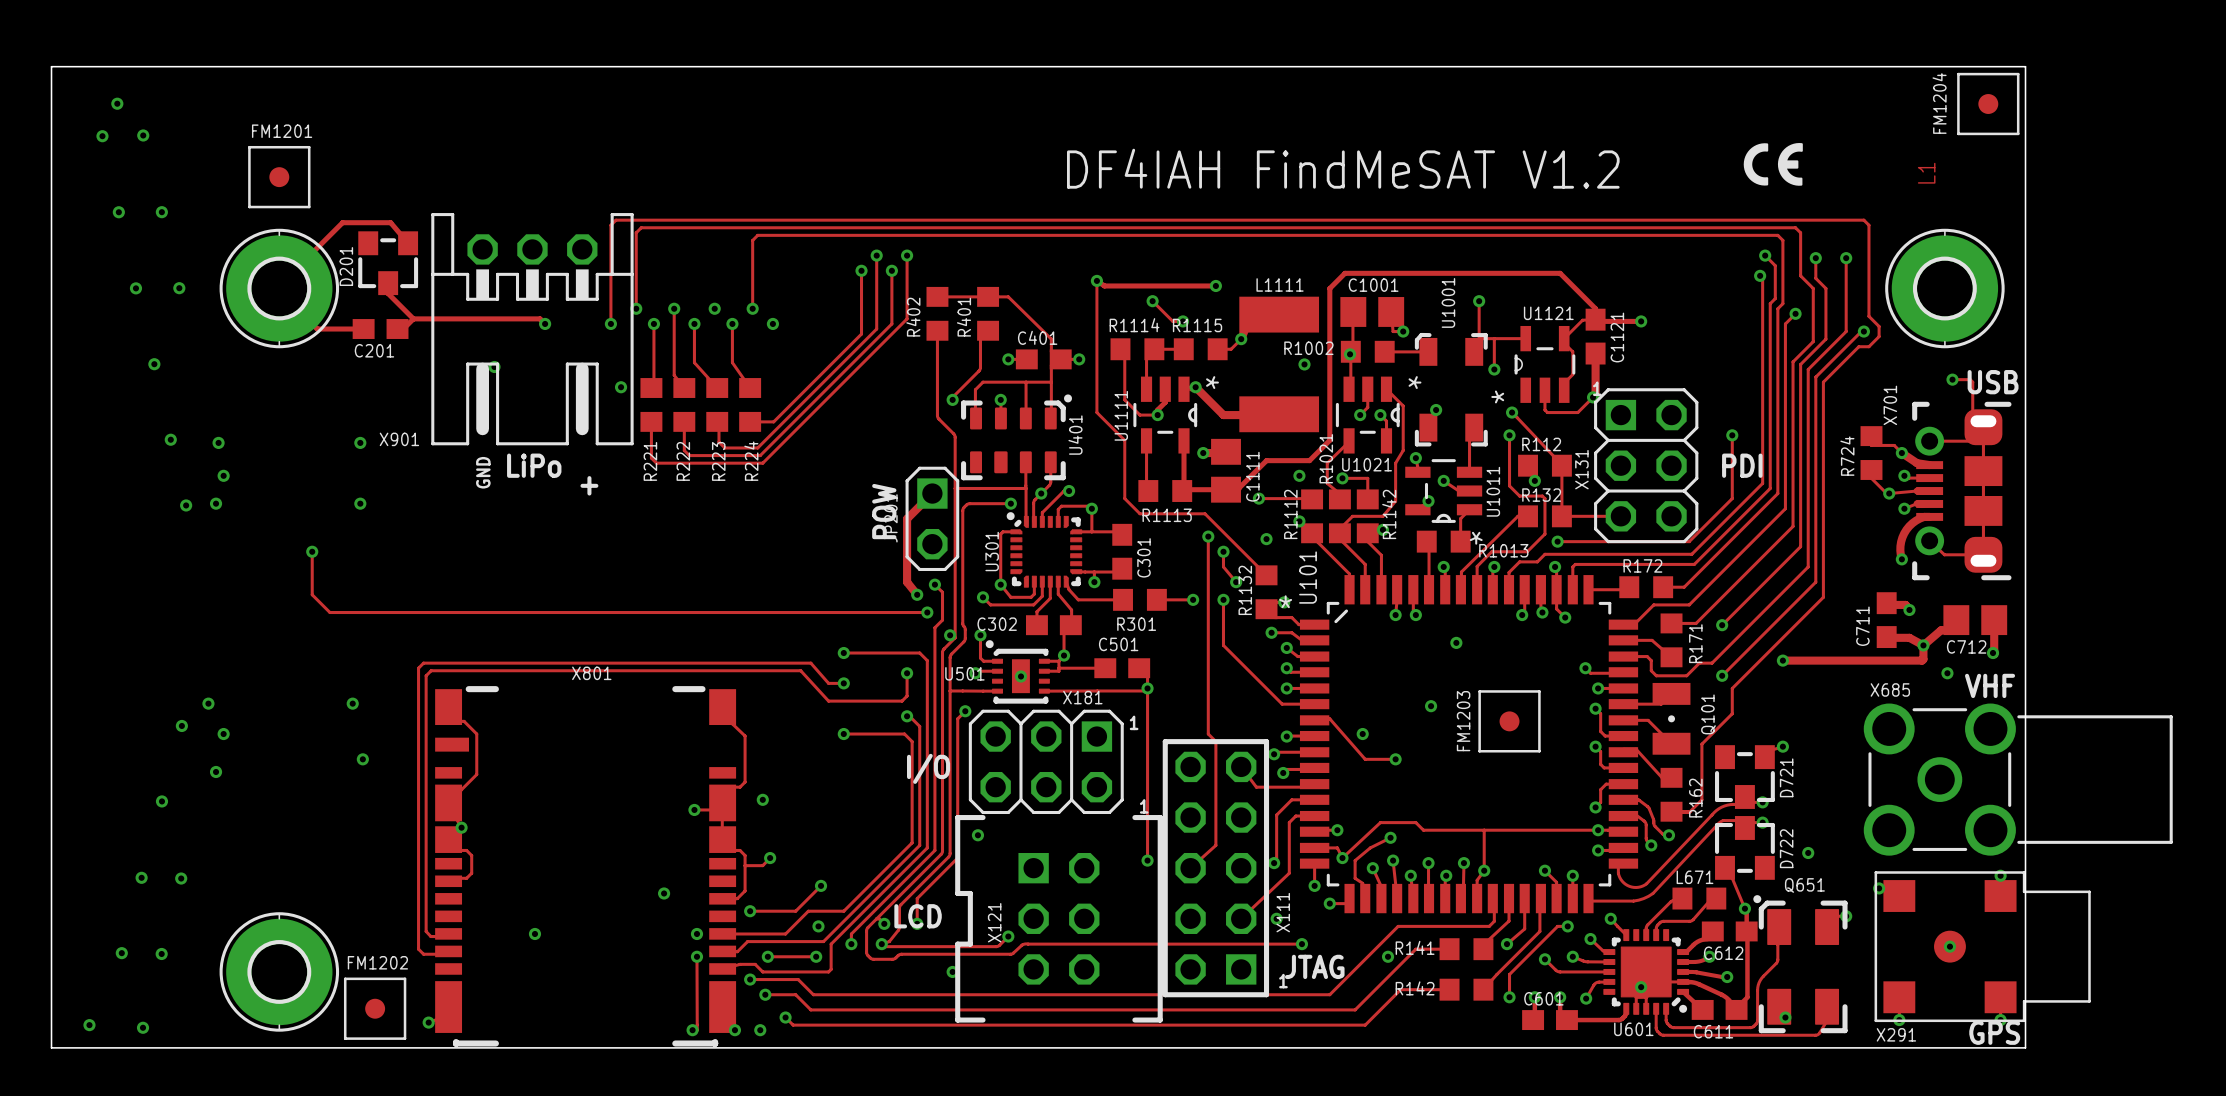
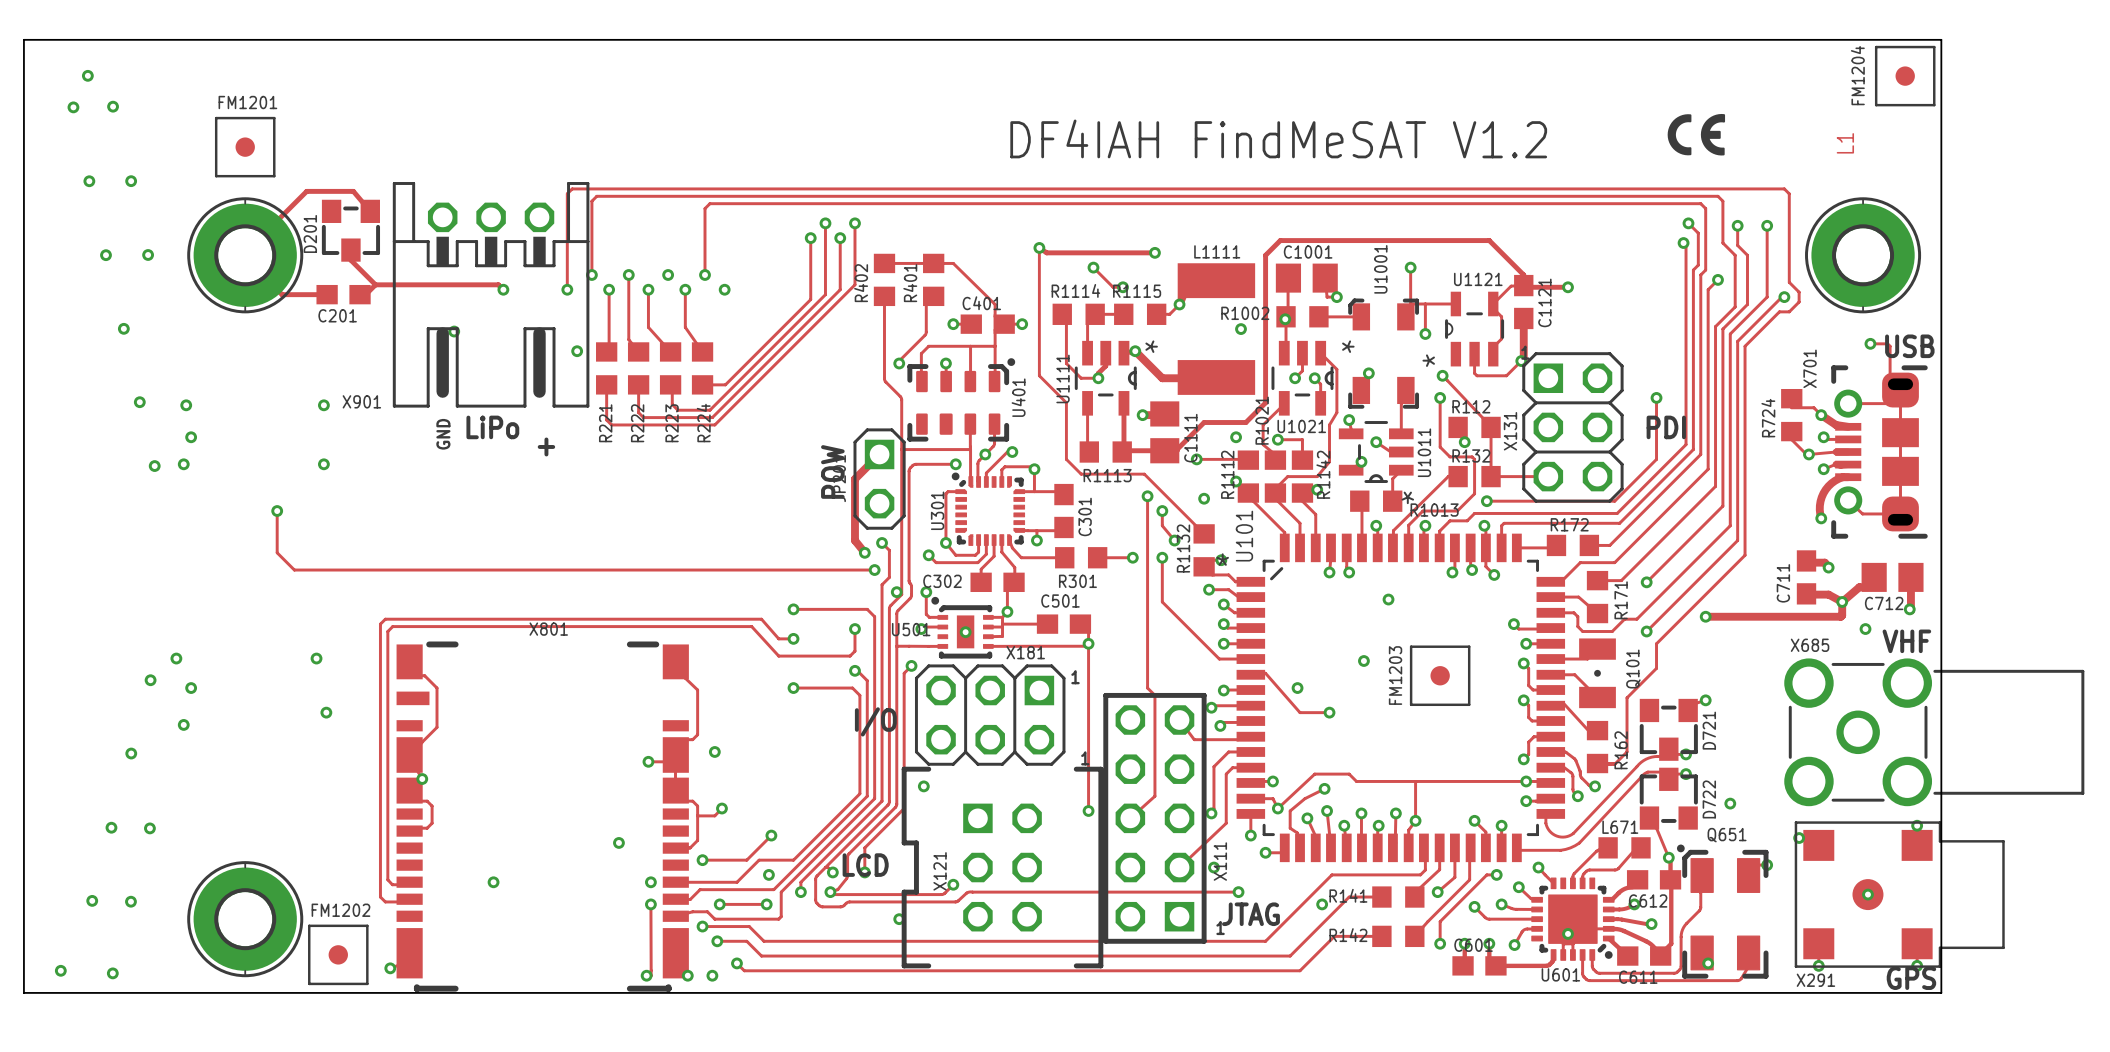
track: none -> (1002, 627) (1002, 636) (988, 636)

